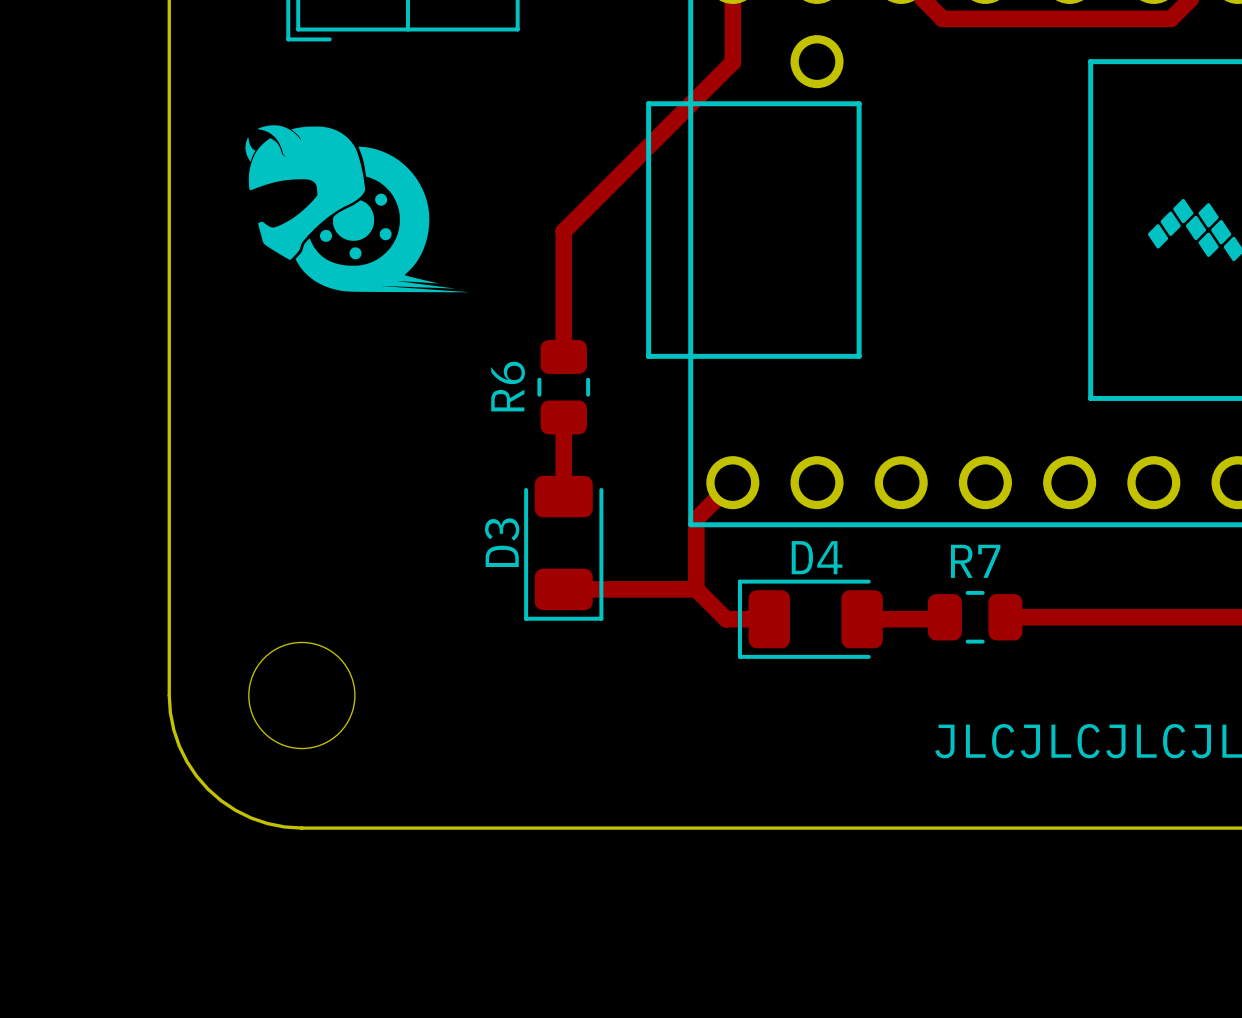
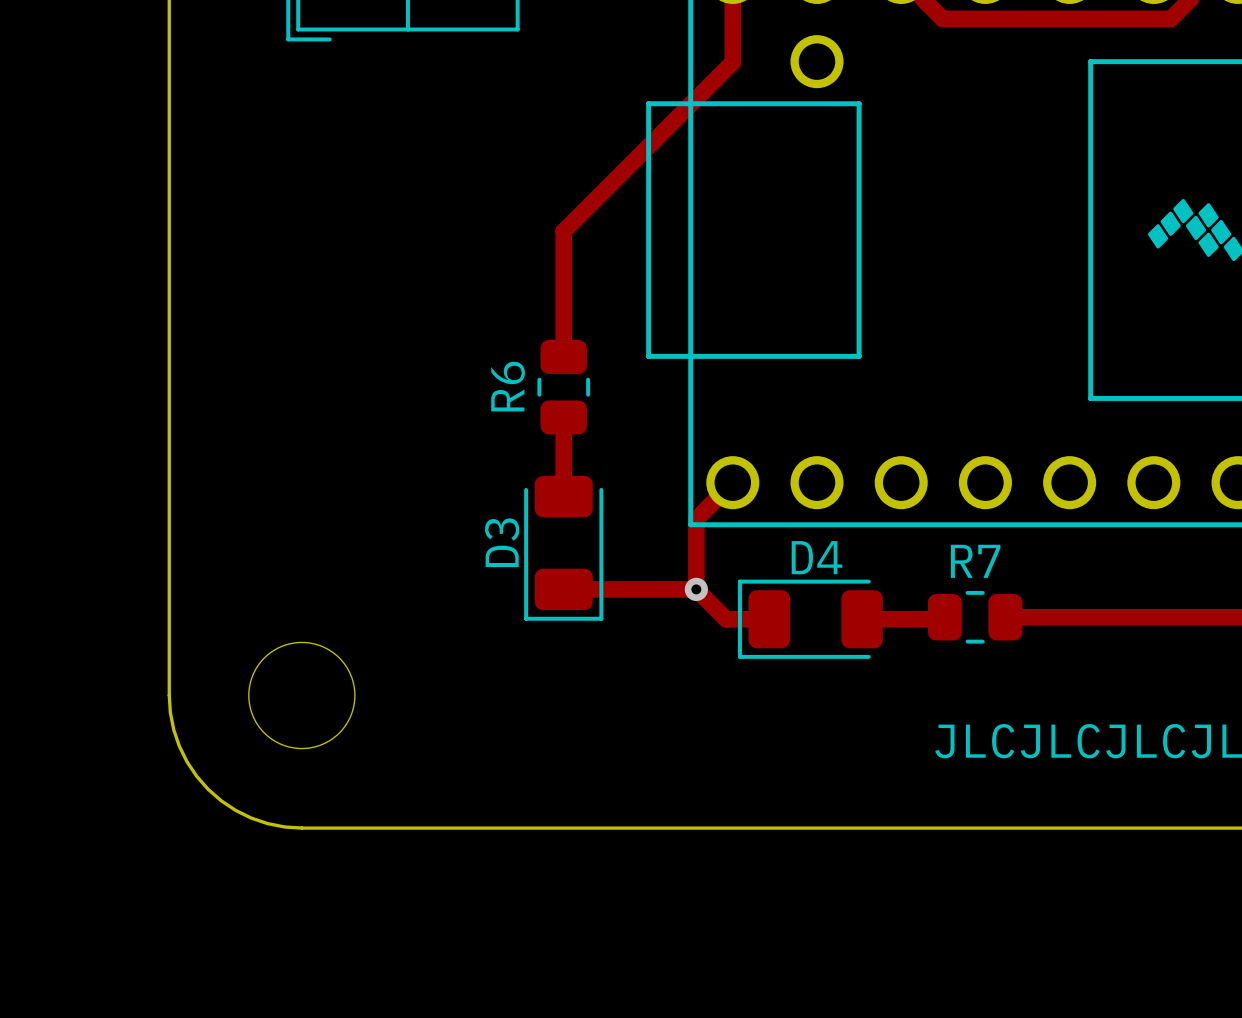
drawing: [245, 125, 469, 293] -> none
via: none -> (696, 589)

